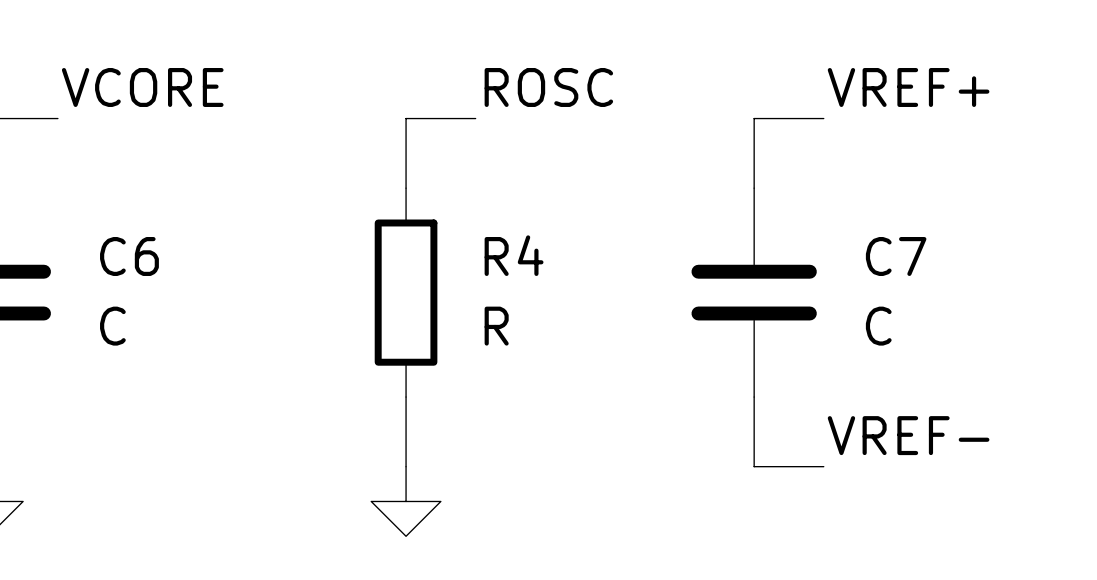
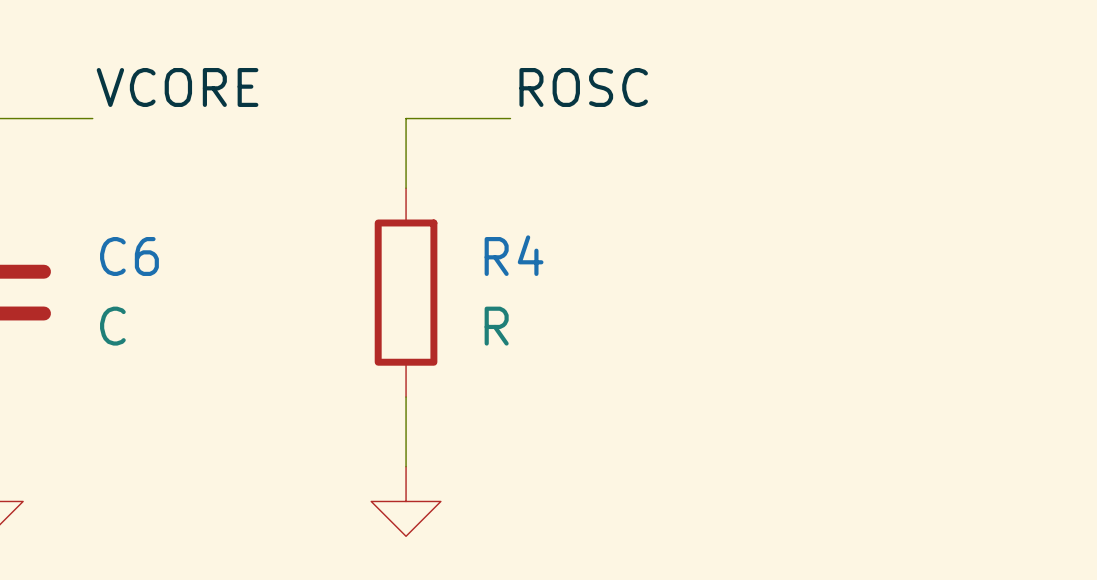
label position: VCORE (142, 87) -> VCORE (177, 87)
label position: ROSC (548, 87) -> ROSC (583, 87)
label: VREF+ (908, 87) -> none
wire: none -> (57, 118) (92, 118)
wire: none -> (475, 118) (510, 118)
wire: (823, 118) (754, 118) (754, 188) -> none
C7: C (754, 292) -> none
wire: (754, 397) (754, 466) (823, 466) -> none
label: VREF- (908, 435) -> none

